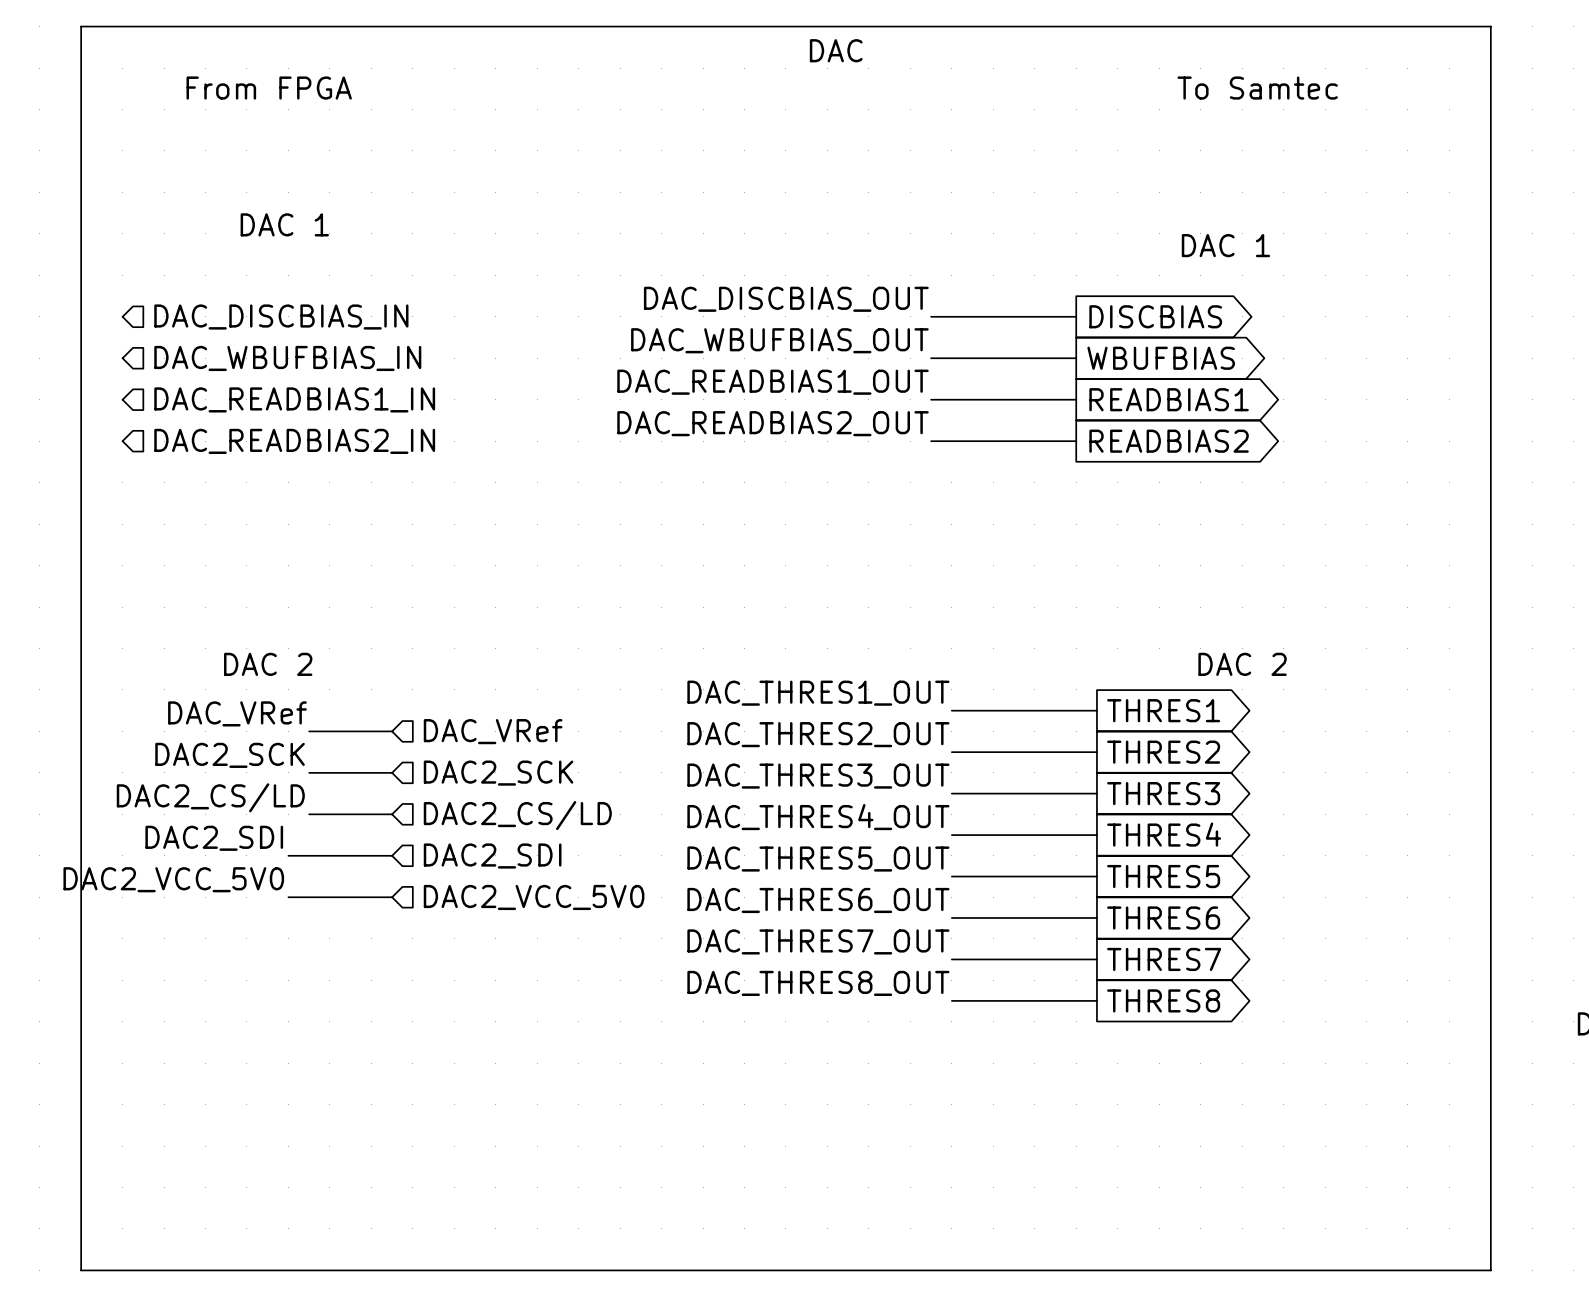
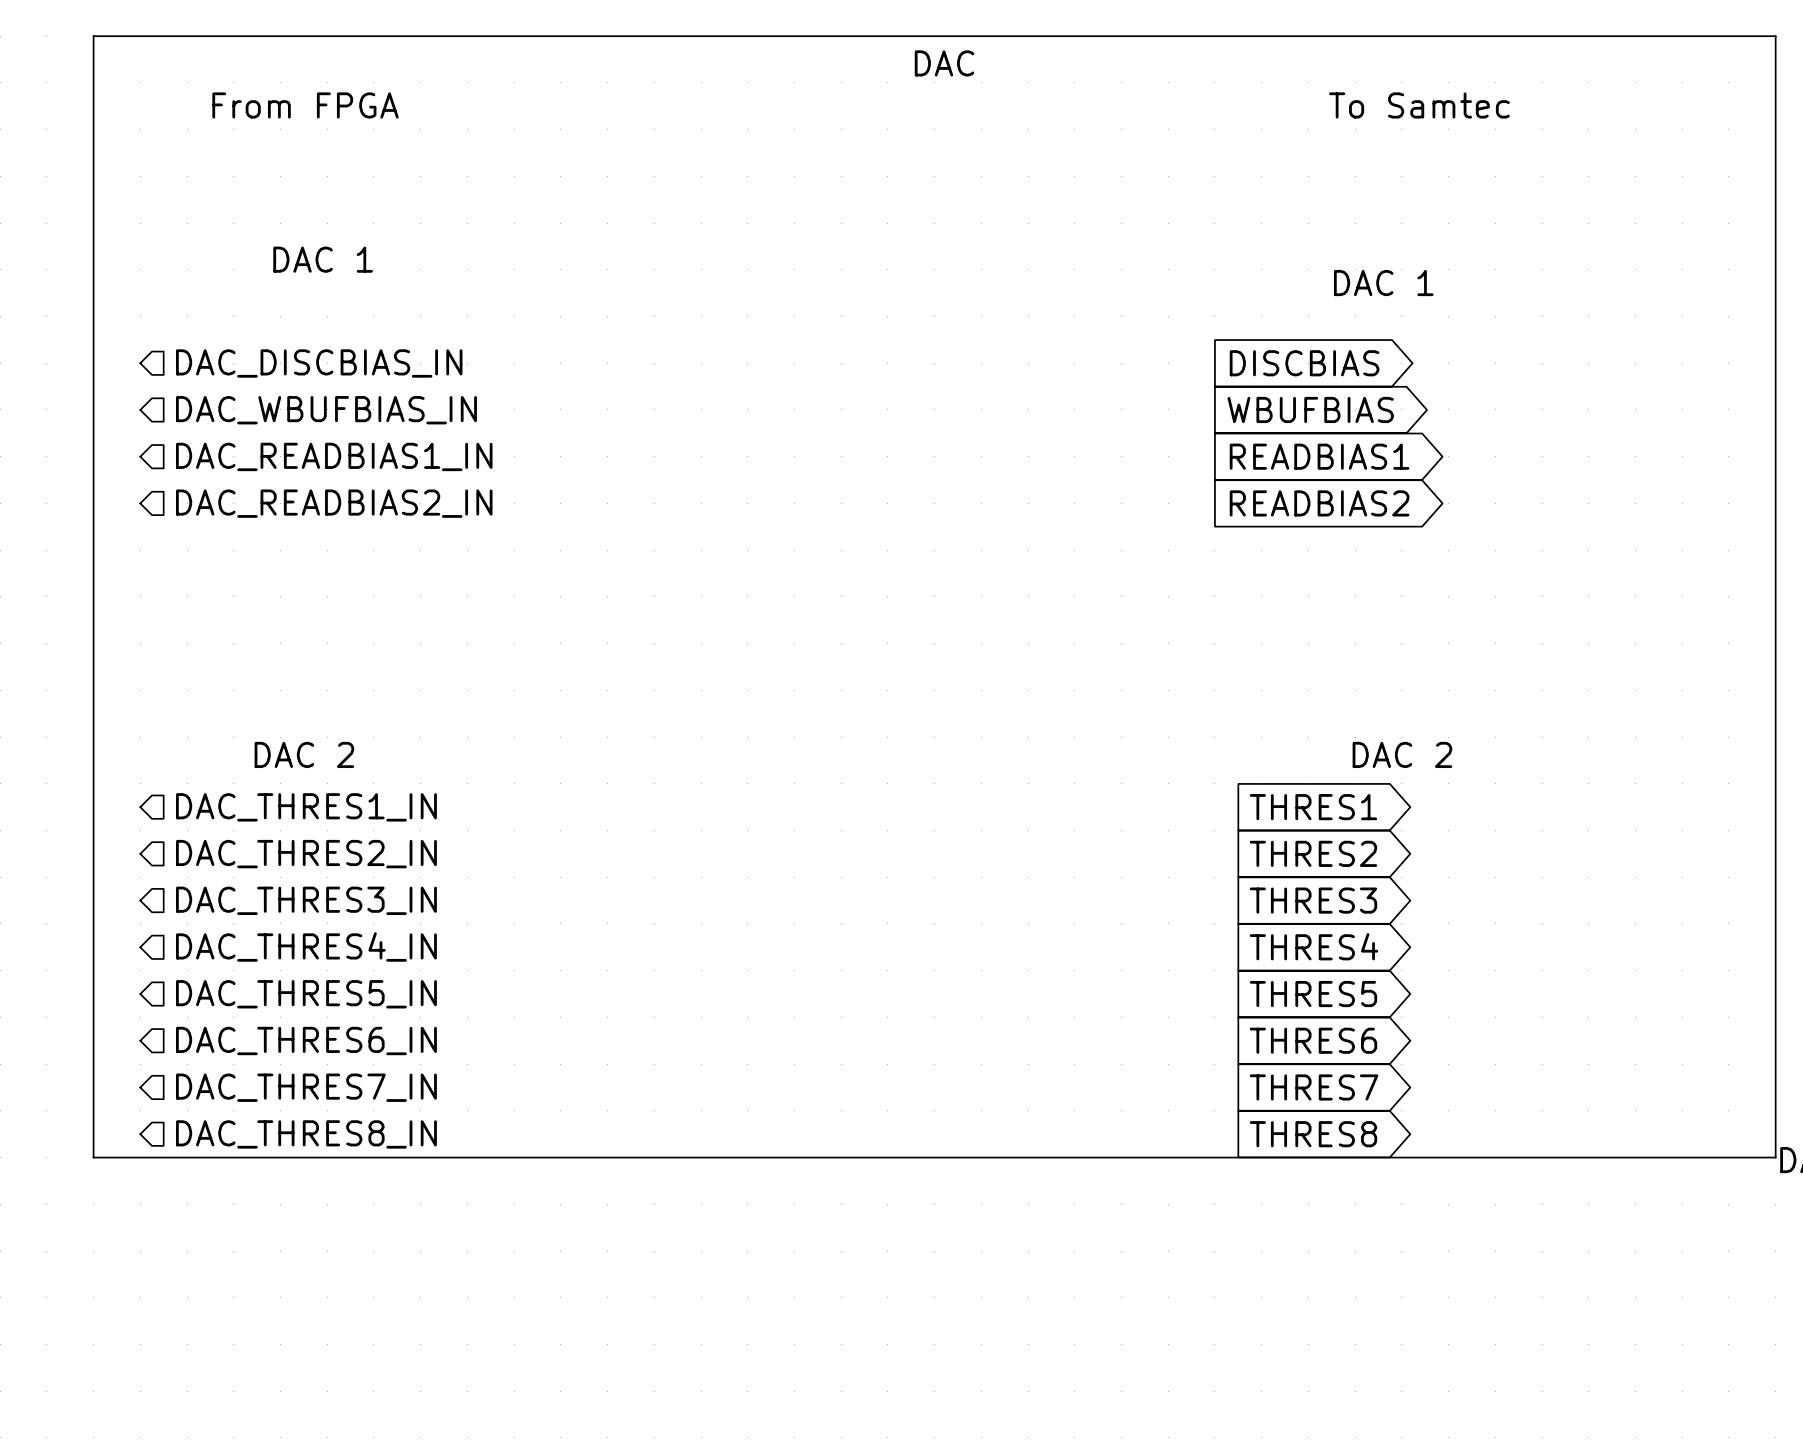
line: (1490, 26) (1490, 1270) (81, 1270) (81, 1021) -> (1682, 36) (1775, 36) (1775, 1157) (93, 1157)
label: DAC_DISCBIAS_OUT (786, 299) -> none
wire: (931, 316) (1076, 316) -> none
label: DAC_WBUFBIAS_OUT (779, 340) -> none
wire: (931, 358) (1076, 358) -> none
label: DAC_READBIAS1_OUT (773, 382) -> none
wire: (931, 399) (1076, 399) -> none
label: DAC_READBIAS2_OUT (773, 423) -> none
wire: (931, 441) (1076, 441) -> none
label: DAC_THRES1_OUT (818, 693) -> none
hierarchical label: none -> DAC_THRES1_IN (306, 807)
wire: (951, 710) (1096, 710) -> none
label: DAC_VRef (237, 713) -> none
wire: (309, 731) (392, 731) -> none
hierarchical label: DAC_VRef (493, 731) -> none
label: DAC_THRES2_OUT (818, 734) -> none
hierarchical label: none -> DAC_THRES2_IN (306, 854)
wire: (951, 752) (1096, 752) -> none
label: DAC2_SCK (230, 755) -> none
wire: (309, 772) (392, 772) -> none
hierarchical label: DAC2_SCK (498, 773) -> none
label: DAC_THRES3_OUT (818, 776) -> none
hierarchical label: none -> DAC_THRES3_IN (306, 900)
wire: (951, 793) (1096, 793) -> none
label: DAC2_CS/LD (210, 797) -> none
wire: (309, 814) (392, 814) -> none
hierarchical label: DAC2_CS/LD (517, 815) -> none
label: DAC_THRES4_OUT (818, 817) -> none
hierarchical label: none -> DAC_THRES4_IN (306, 946)
wire: (951, 835) (1096, 835) -> none
label: DAC2_SDI (214, 838) -> none
wire: (288, 855) (392, 855) -> none
hierarchical label: DAC2_SDI (492, 856) -> none
label: DAC_THRES5_OUT (818, 859) -> none
hierarchical label: none -> DAC_THRES5_IN (306, 994)
wire: (951, 876) (1096, 876) -> none
label: DAC2_VCC_5V0 (173, 879) -> none
wire: (288, 897) (392, 897) -> none
hierarchical label: DAC2_VCC_5V0 (534, 897) -> none
label: DAC_THRES6_OUT (818, 900) -> none
wire: (951, 917) (1096, 917) -> none
hierarchical label: none -> DAC_THRES6_IN (306, 1040)
label: DAC_THRES7_OUT (818, 941) -> none
hierarchical label: none -> DAC_THRES7_IN (306, 1087)
wire: (951, 959) (1096, 959) -> none
label: DAC_THRES8_OUT (818, 983) -> none
wire: (951, 1000) (1096, 1000) -> none
hierarchical label: none -> DAC_THRES8_IN (306, 1134)

